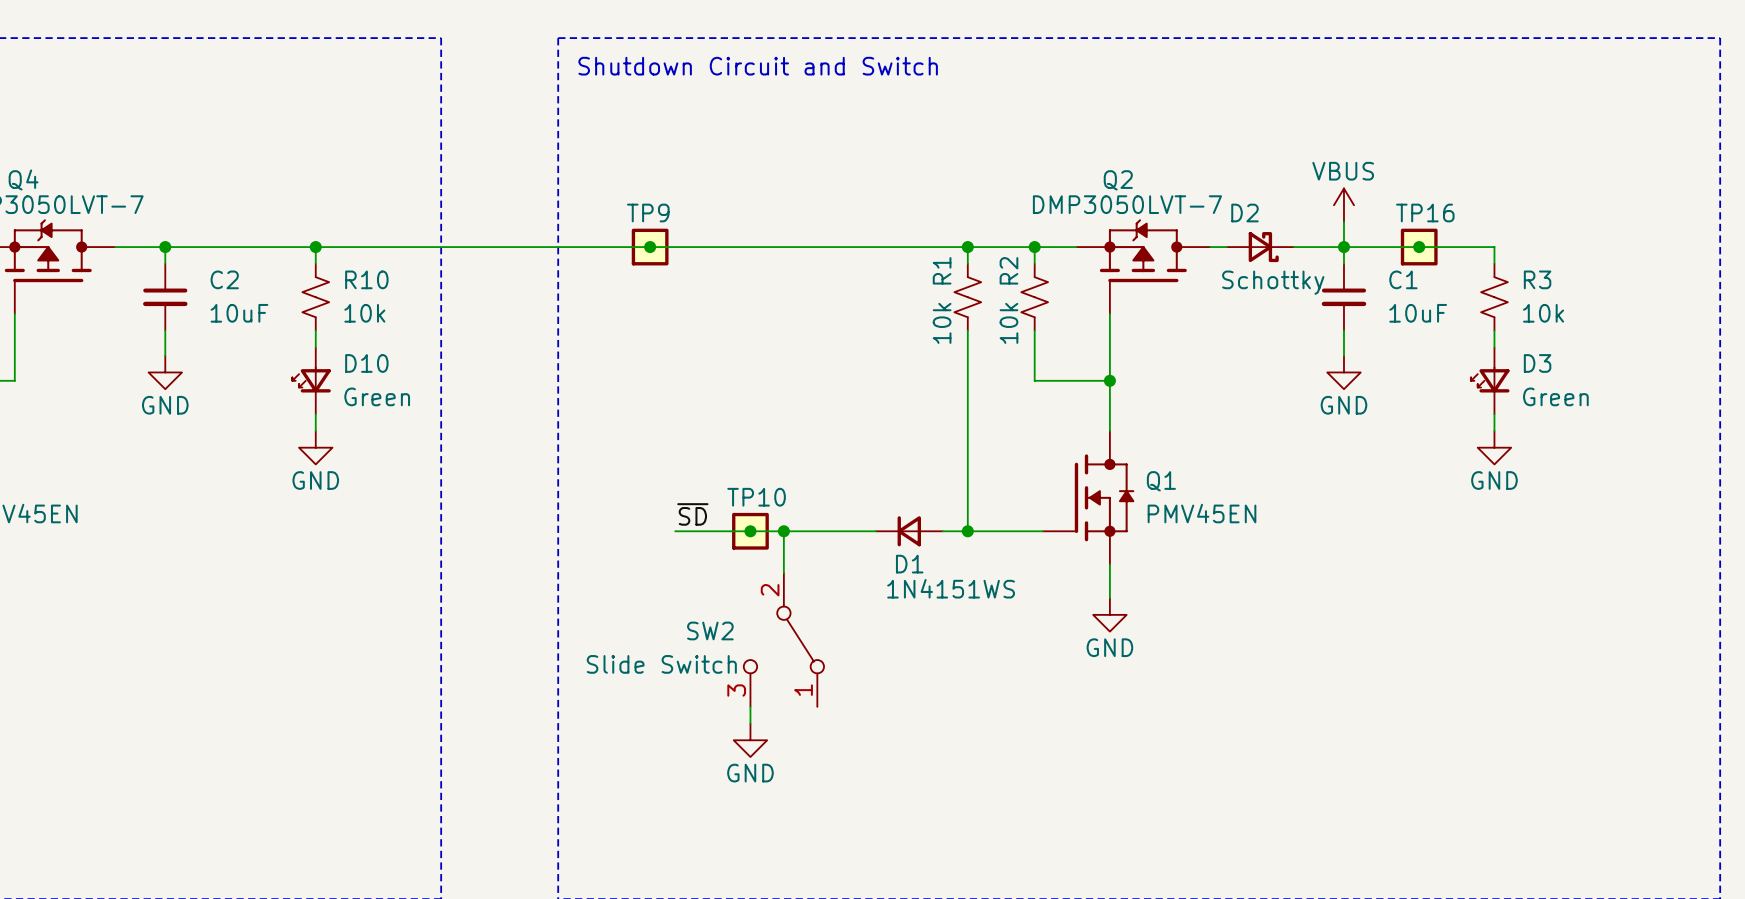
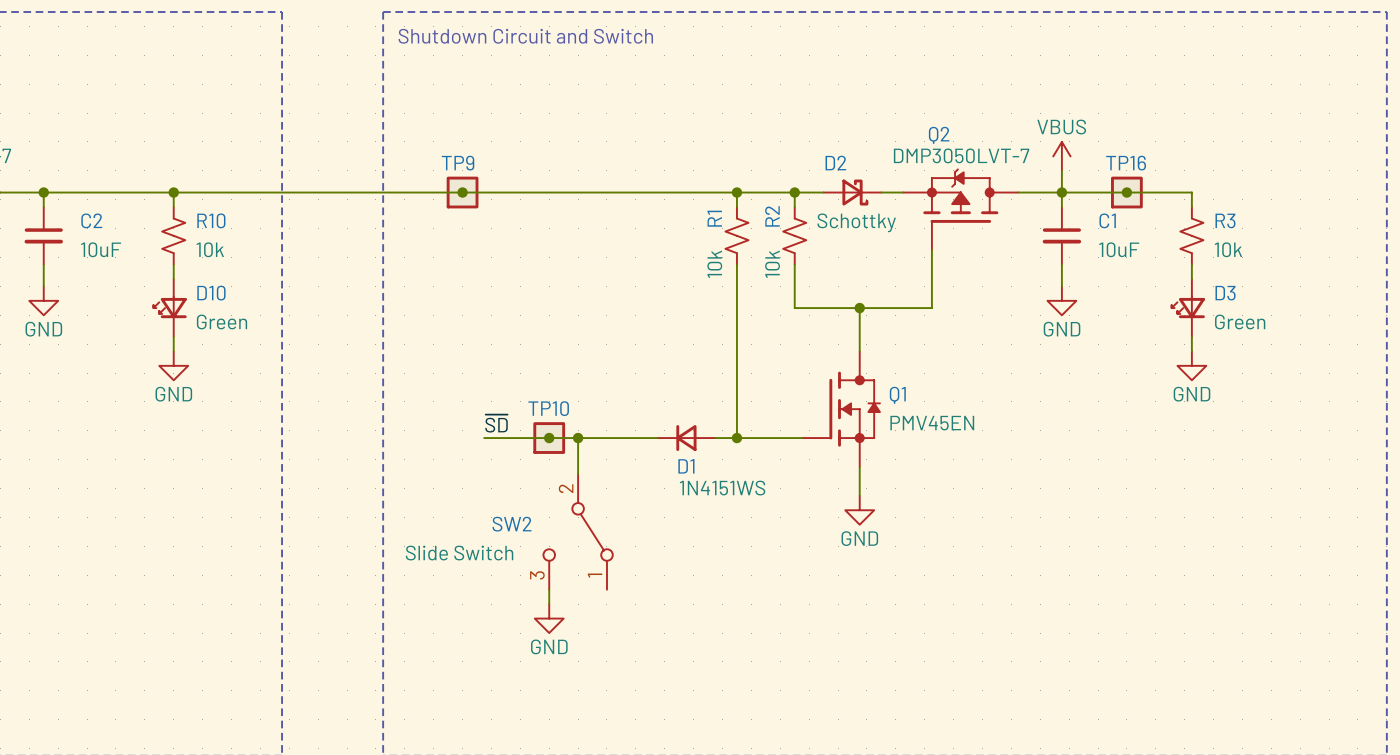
Q2 value position: DMP3050LVT-7 (1127, 204) -> DMP3050LVT-7 (961, 155)
wire: none -> (881, 192) (903, 192)
D2 position: (1260, 247) -> (852, 192)
Q2 position: (1143, 266) -> (960, 209)
wire: (1109, 313) (1109, 380) -> (931, 250) (931, 308) (859, 308)

